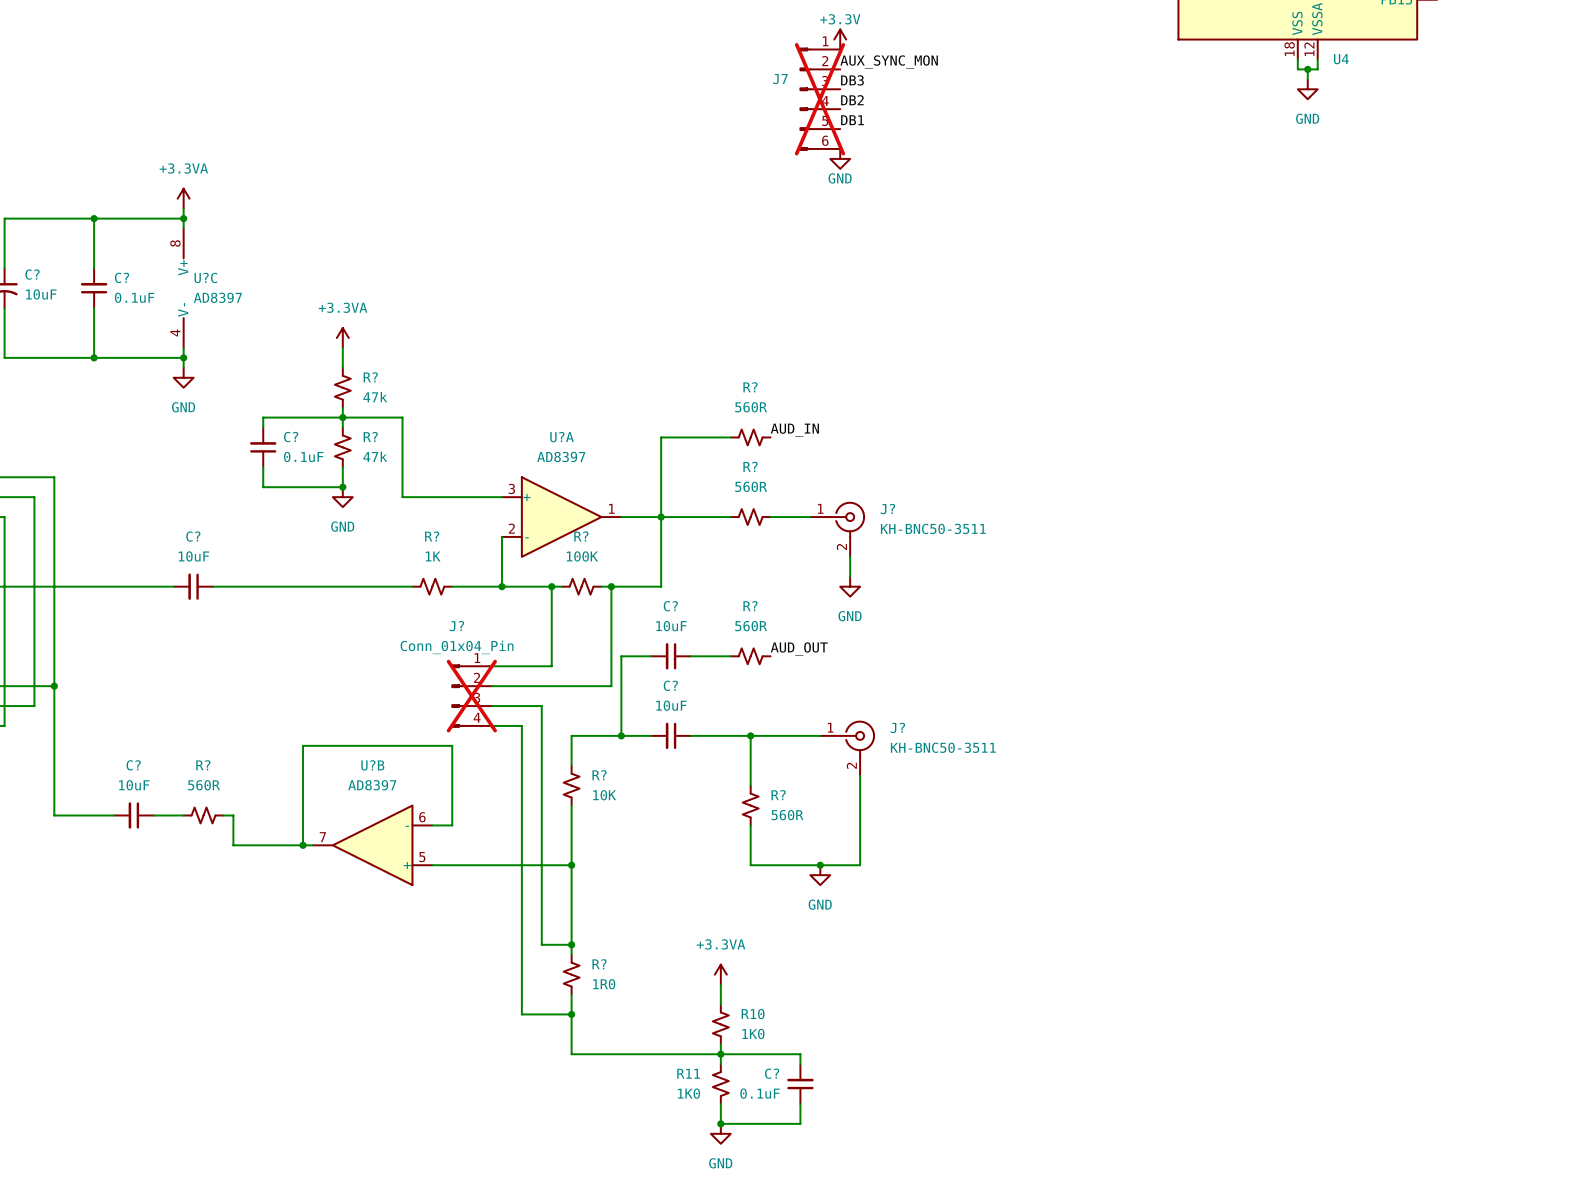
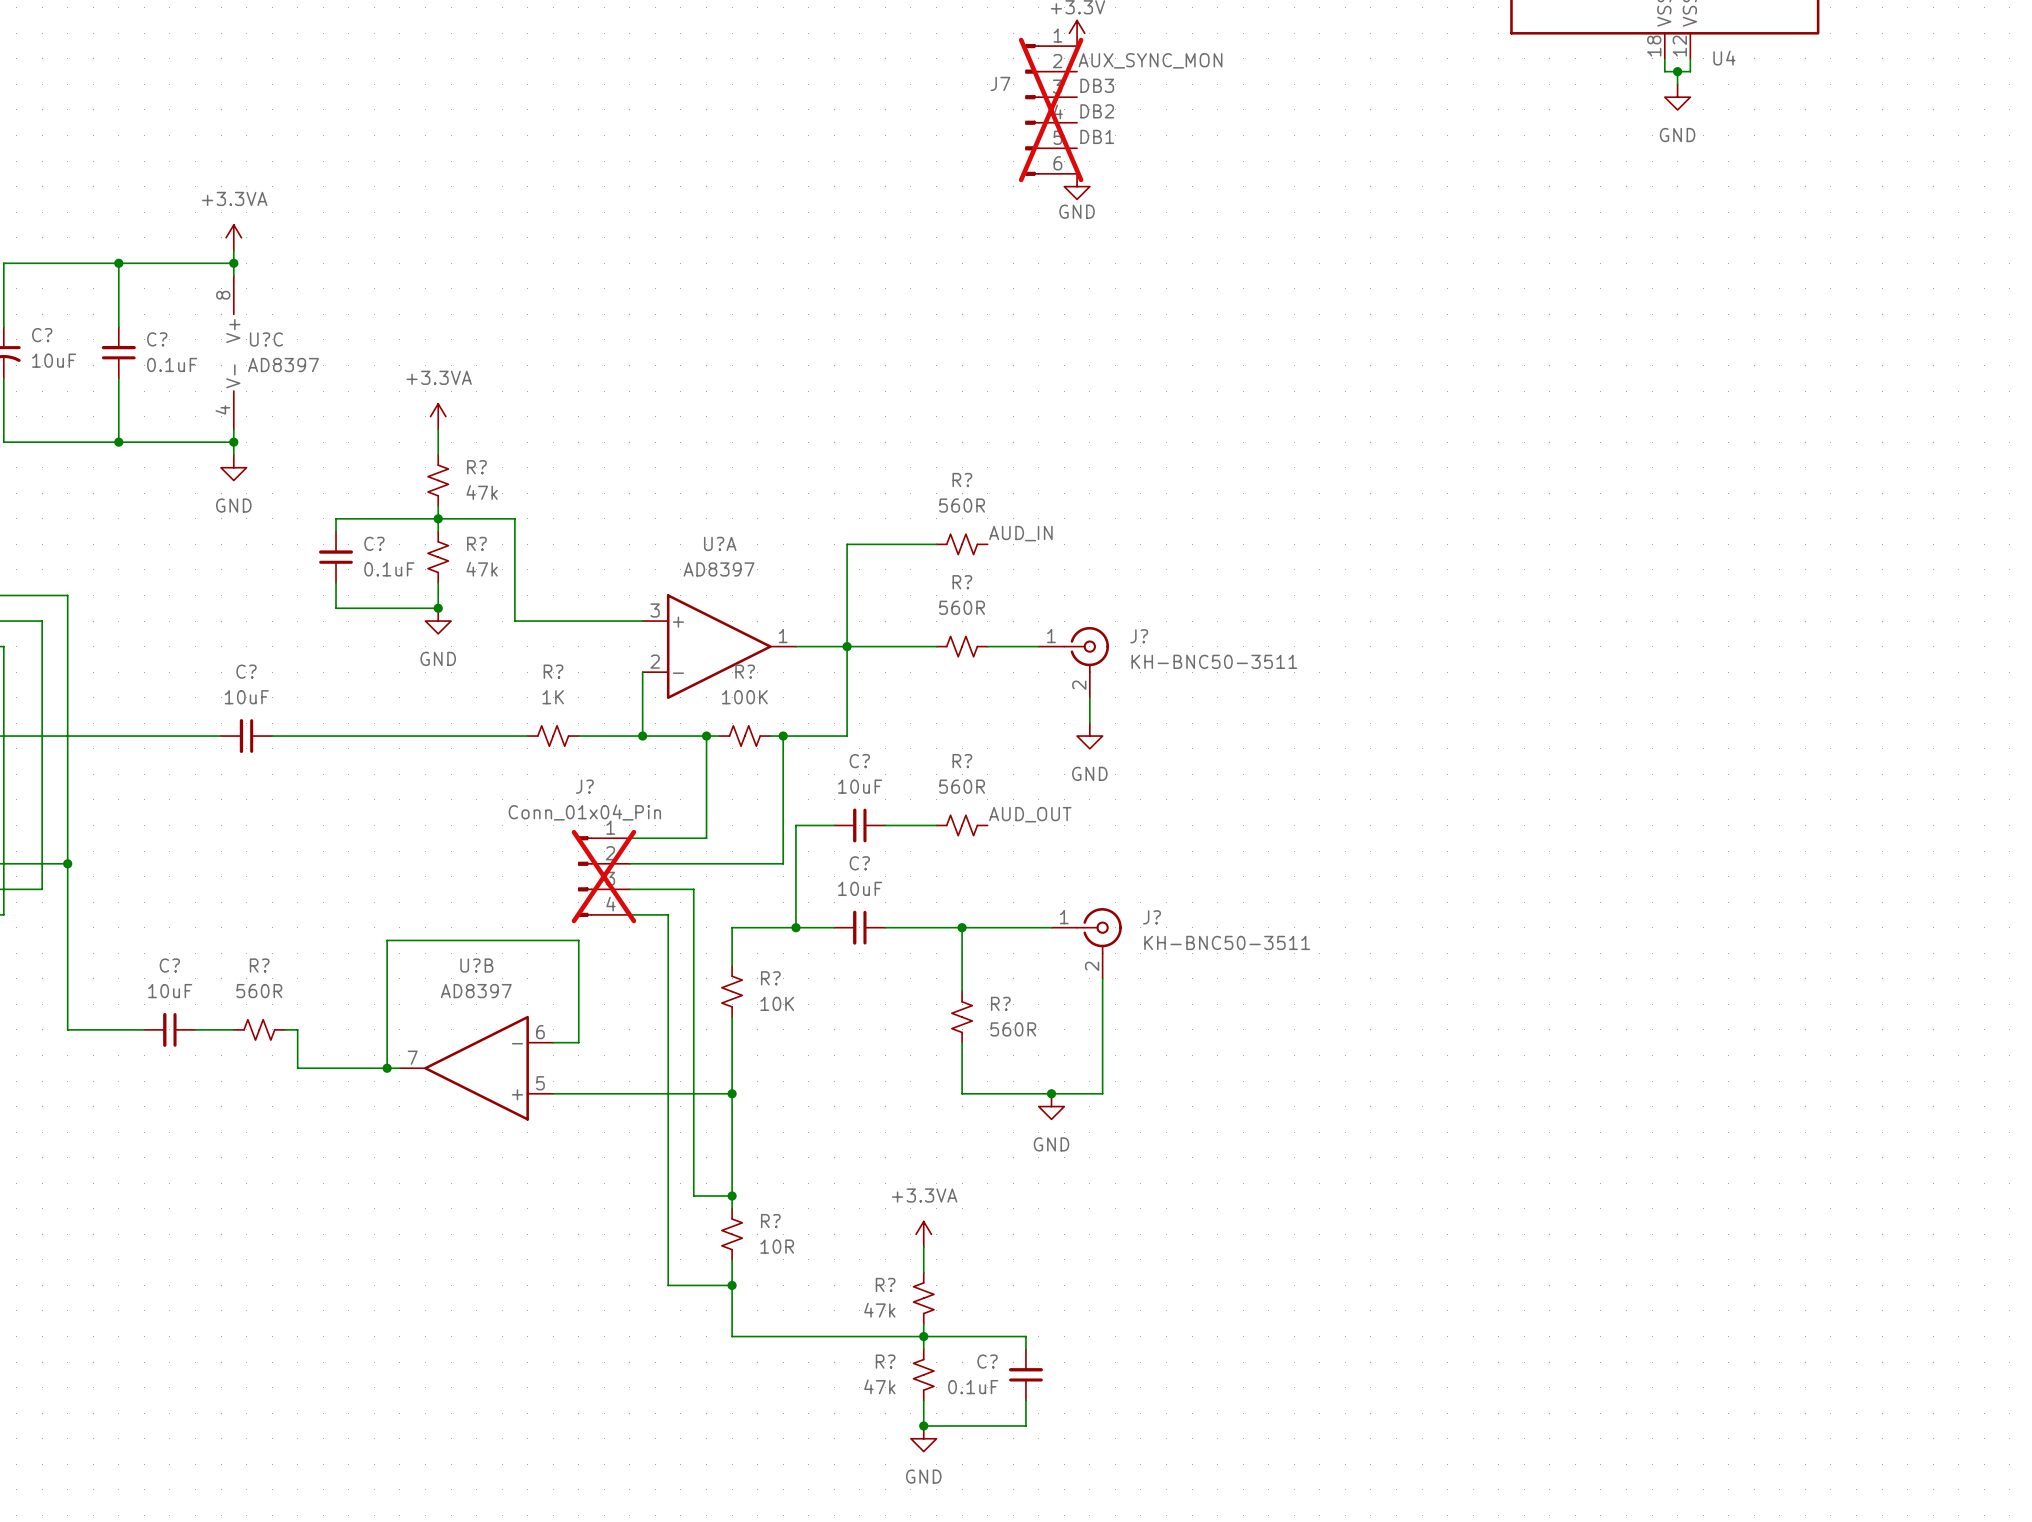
R? value: 1R0 (604, 984) -> 10R (777, 1246)
R10: 1K0 (720, 1024) -> none
R?: none -> 47k (923, 1298)
R11 name: R11 (688, 1073) -> R? (885, 1361)
R11 value: 1K0 (688, 1093) -> 47k (879, 1386)

